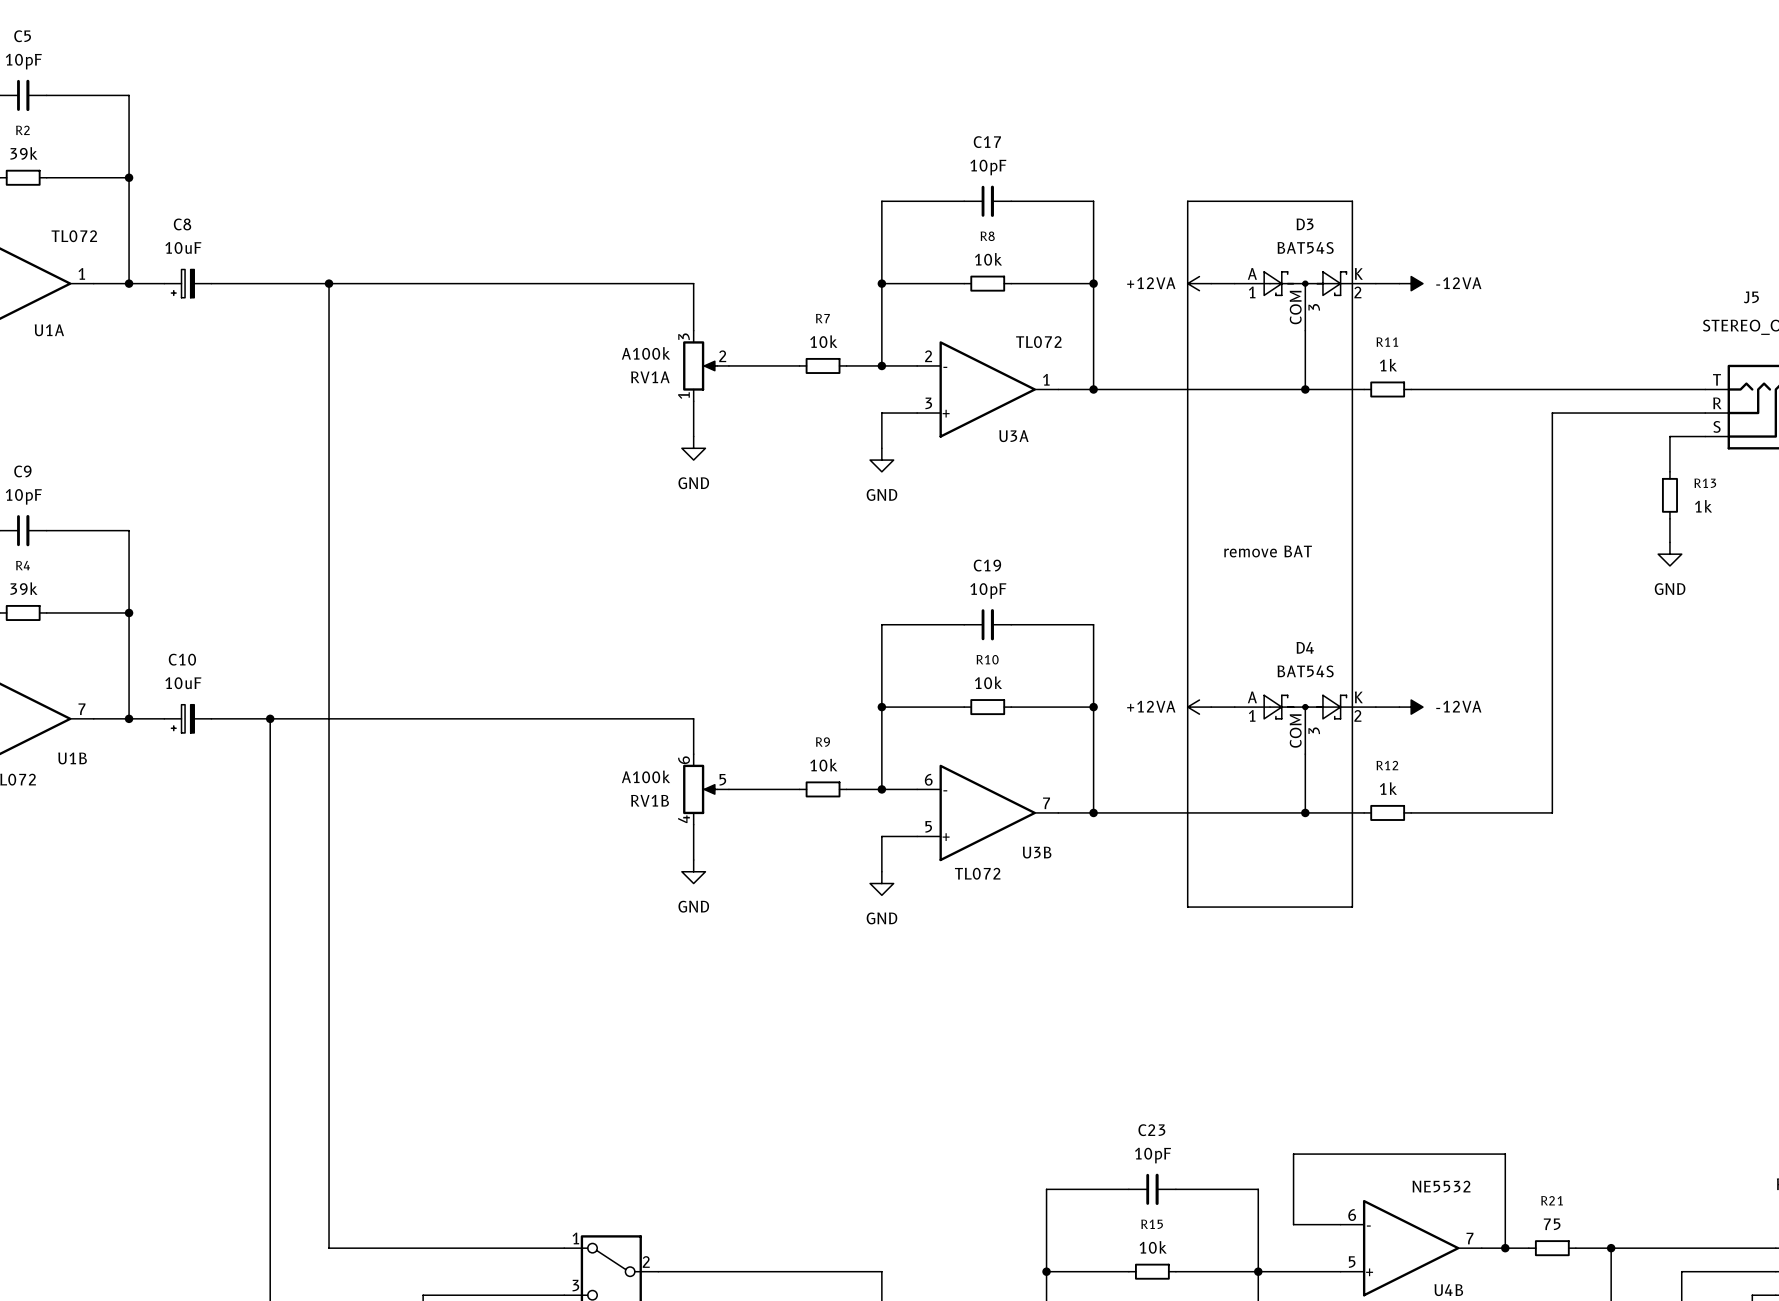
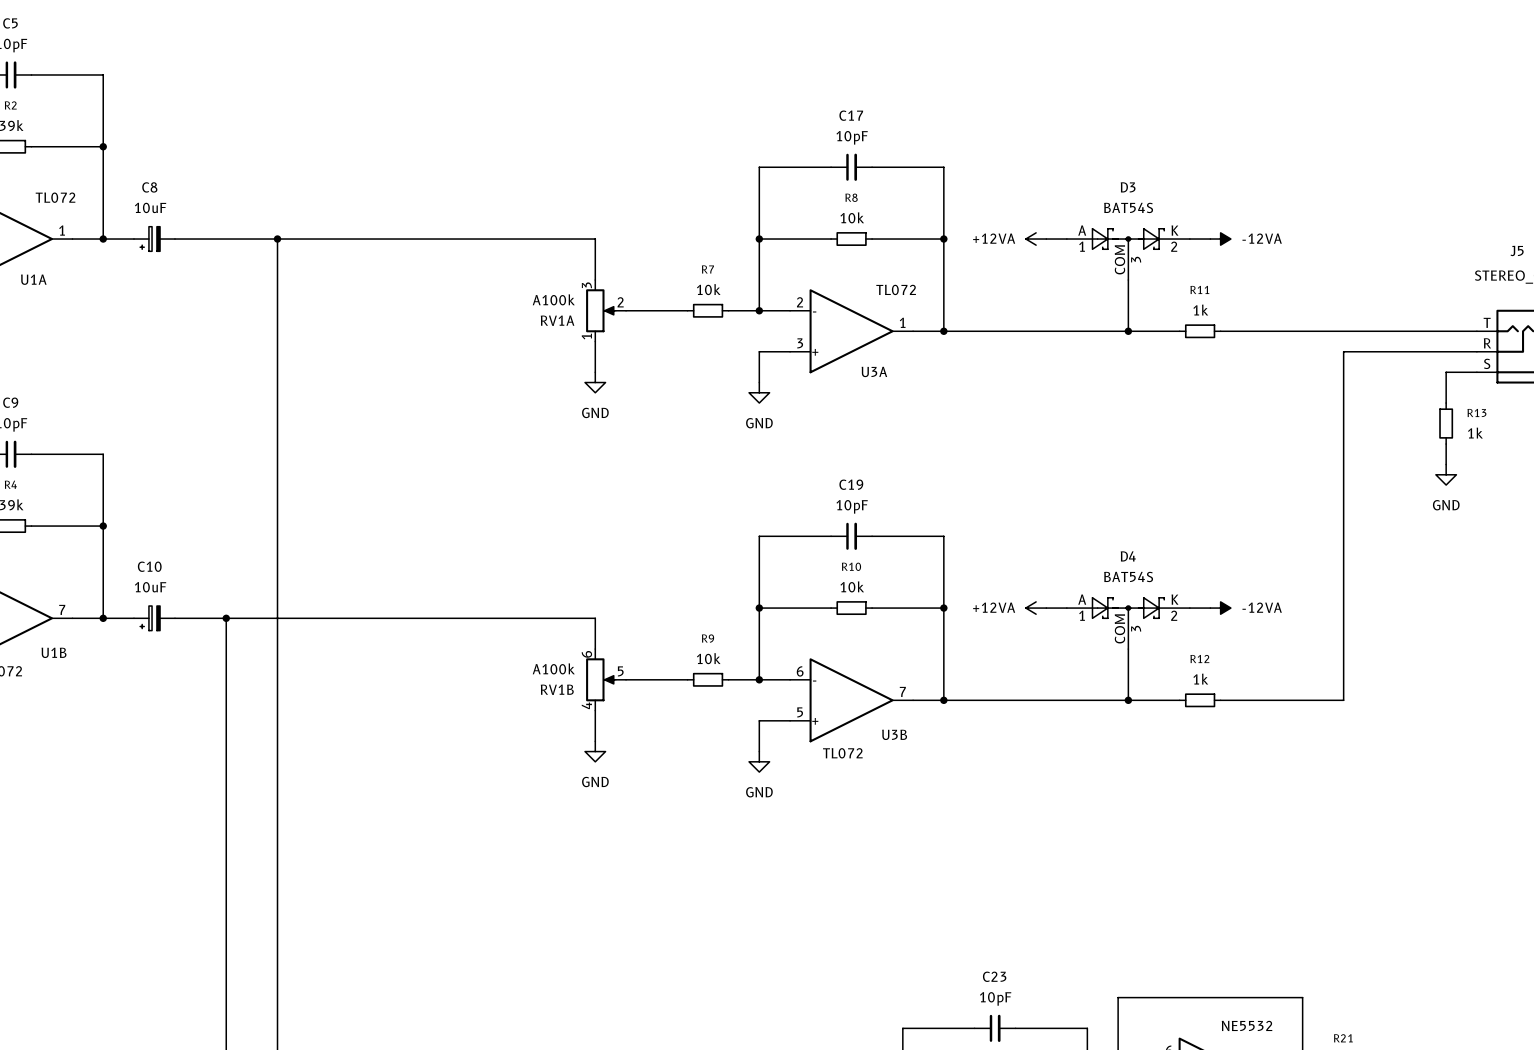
line: (1187, 201) (1352, 201) (1352, 907) (1187, 907) (1187, 201) -> none
text: remove BAT (1268, 551) -> none

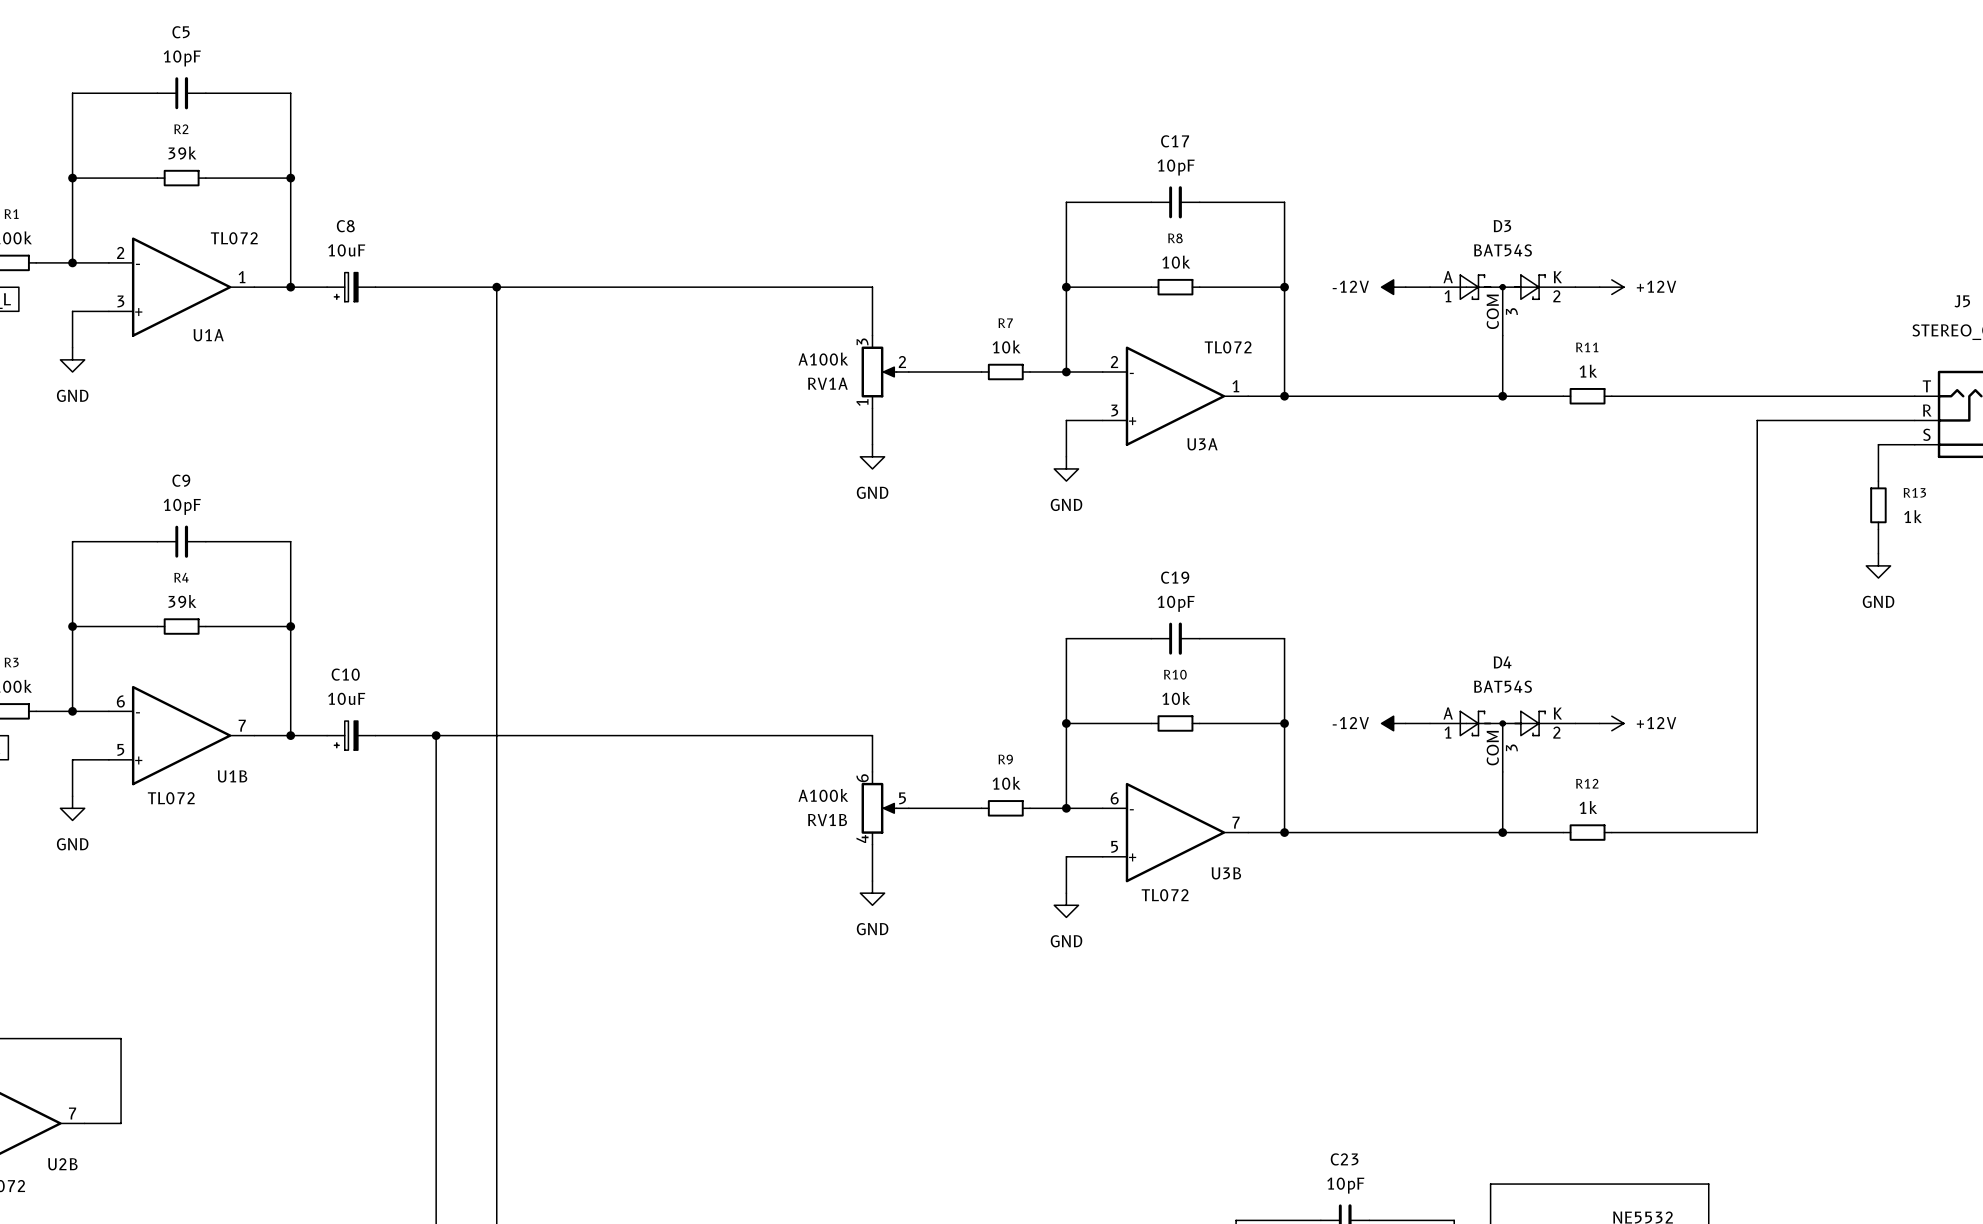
power symbol: +12VA (1036, 239) -> -12V (1393, 287)
power symbol: -12VA (1220, 239) -> +12V (1611, 287)
power symbol: +12VA (1036, 608) -> -12V (1393, 723)
power symbol: -12VA (1220, 608) -> +12V (1611, 723)

